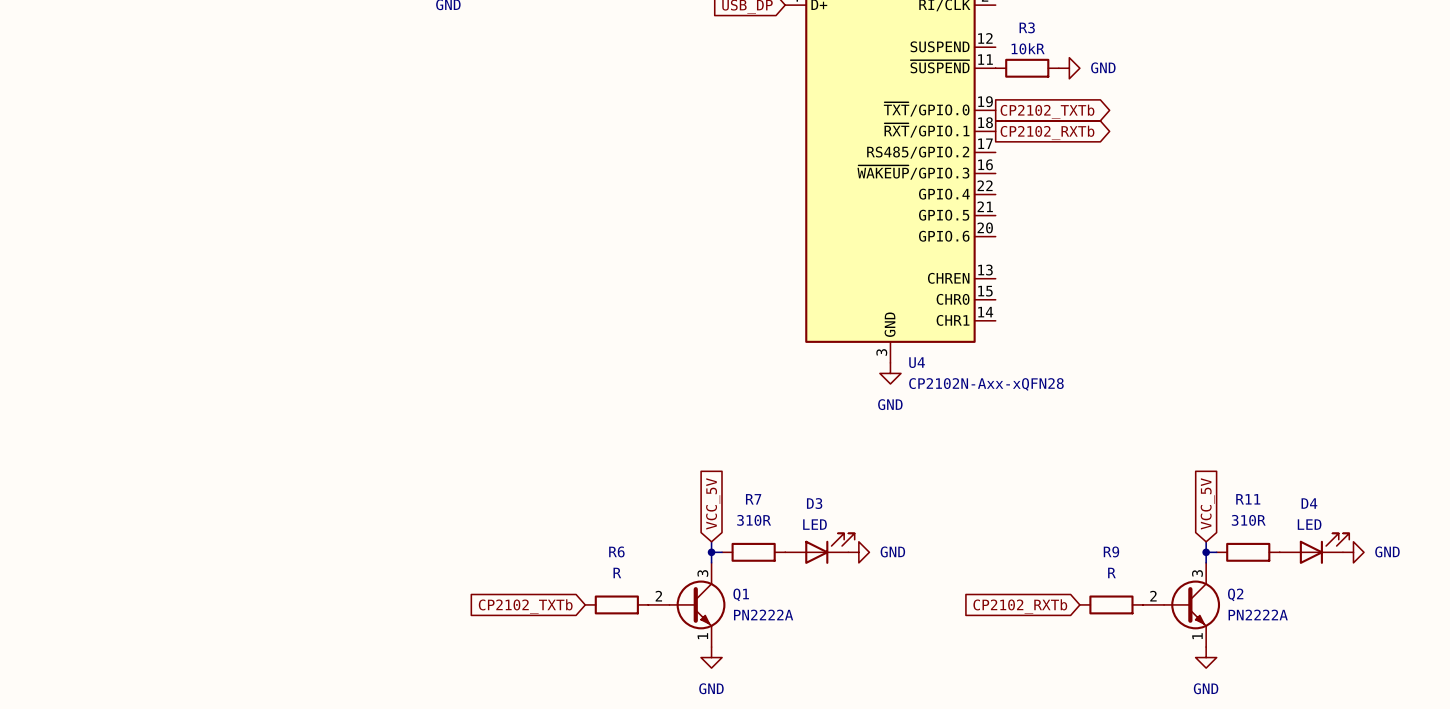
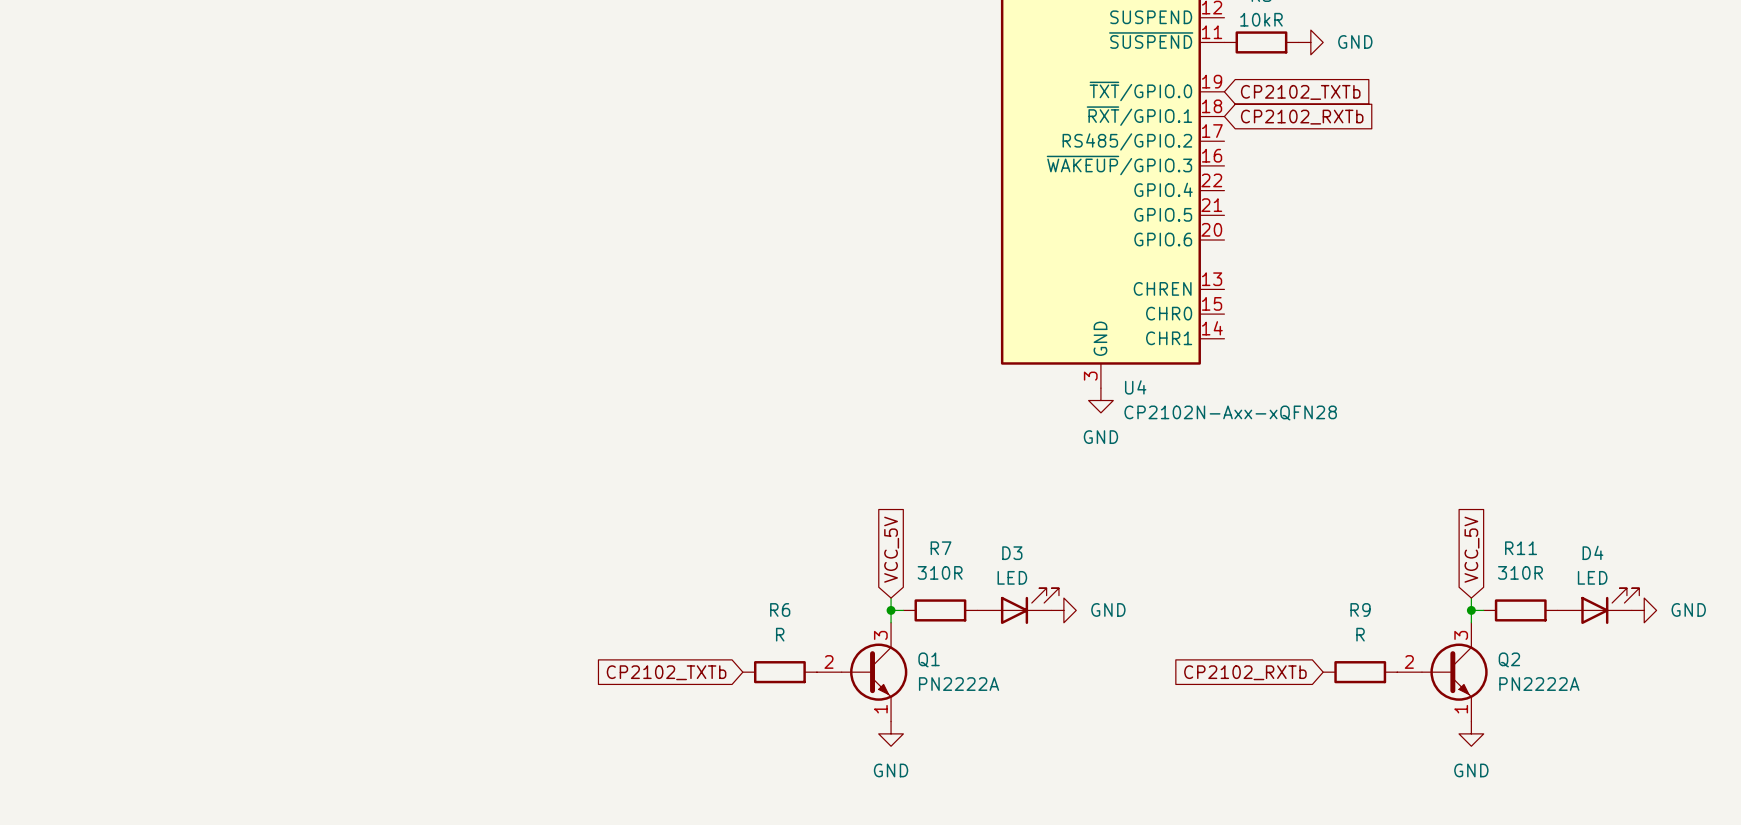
global label shape: output (1047, 111) -> input (1300, 92)
global label shape: output (1047, 132) -> input (1302, 117)

